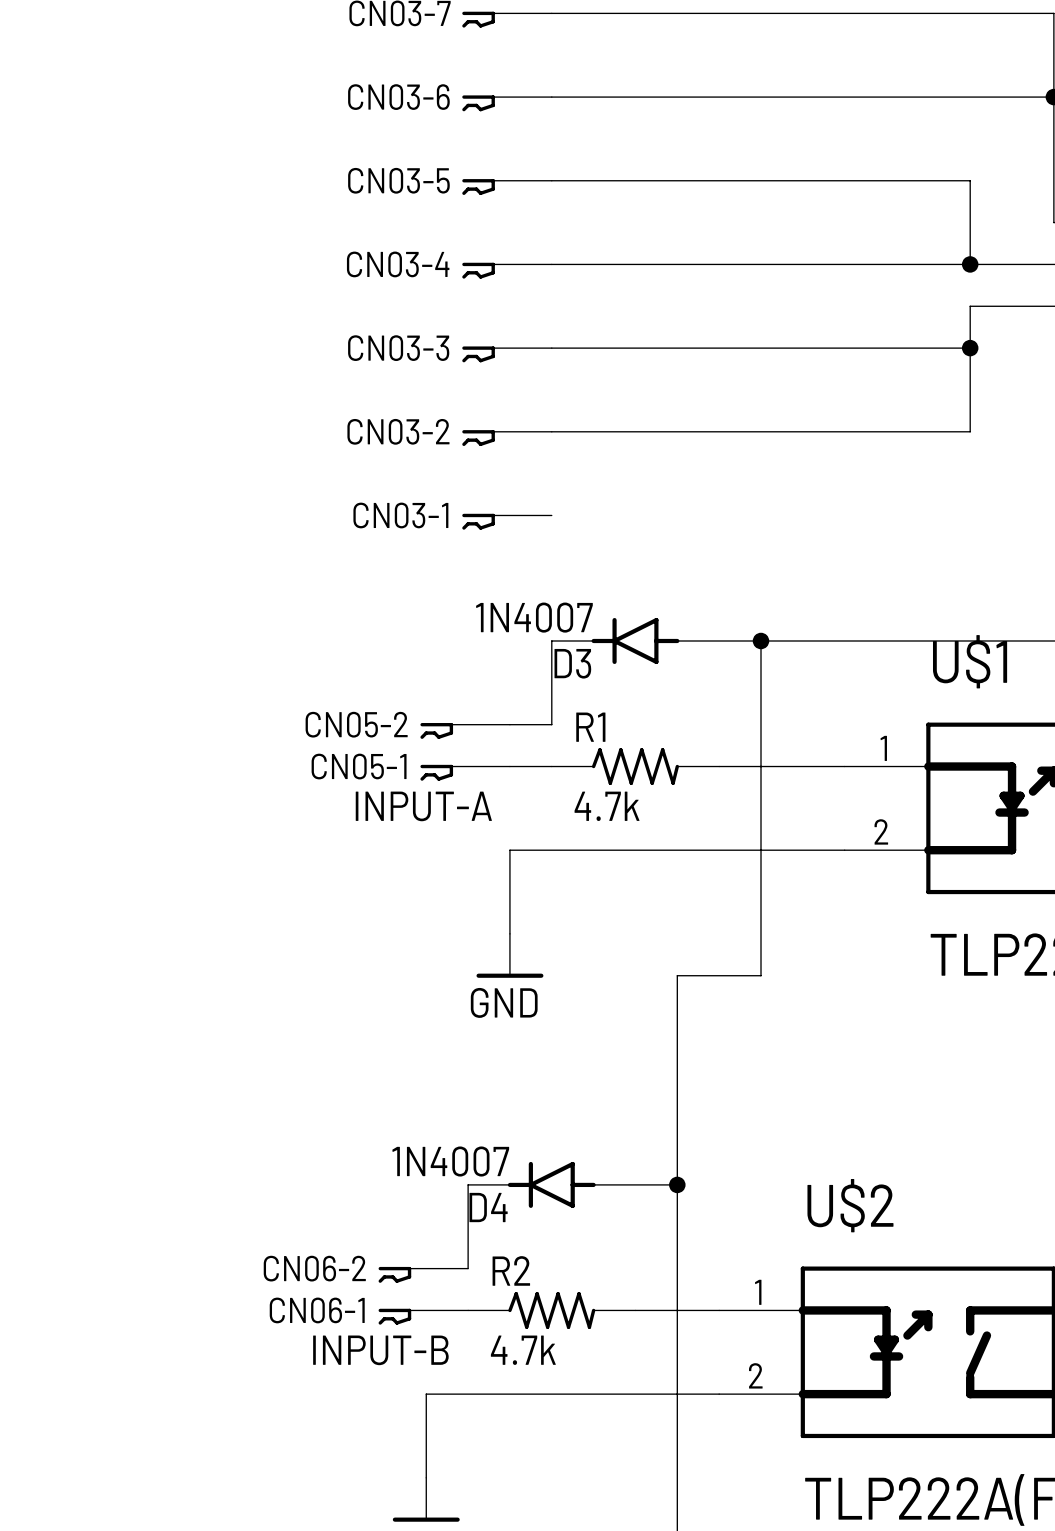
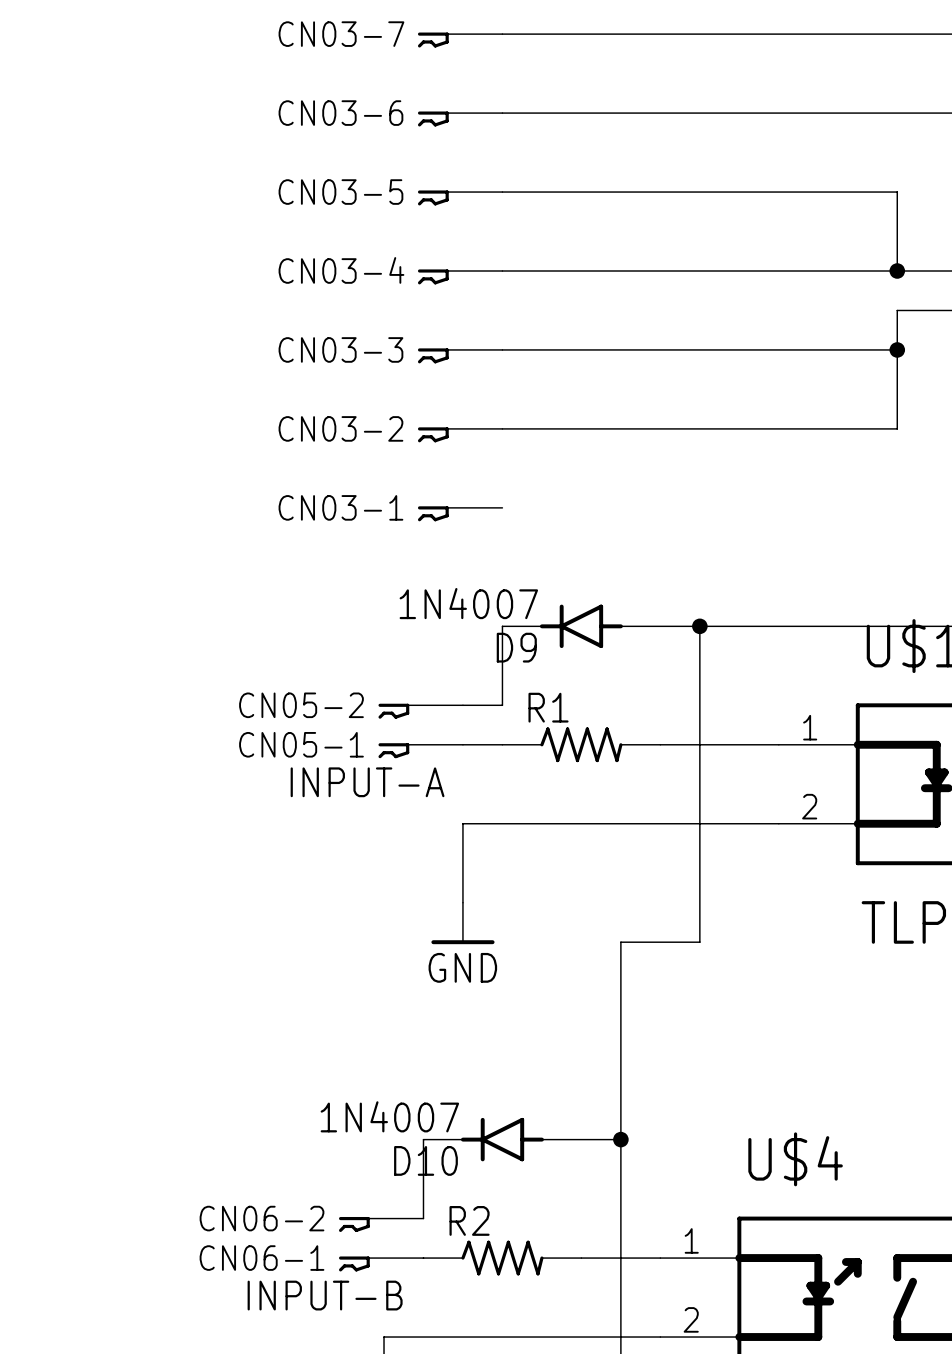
D3 name: D3 (572, 663) -> D9 (516, 647)
R1 value: 4.7k (607, 806) -> none
U$2 name: U$2 (850, 1205) -> U$4 (795, 1159)
D4 name: D4 (488, 1207) -> D10 (425, 1160)
R2 value: 4.7k (523, 1350) -> none

